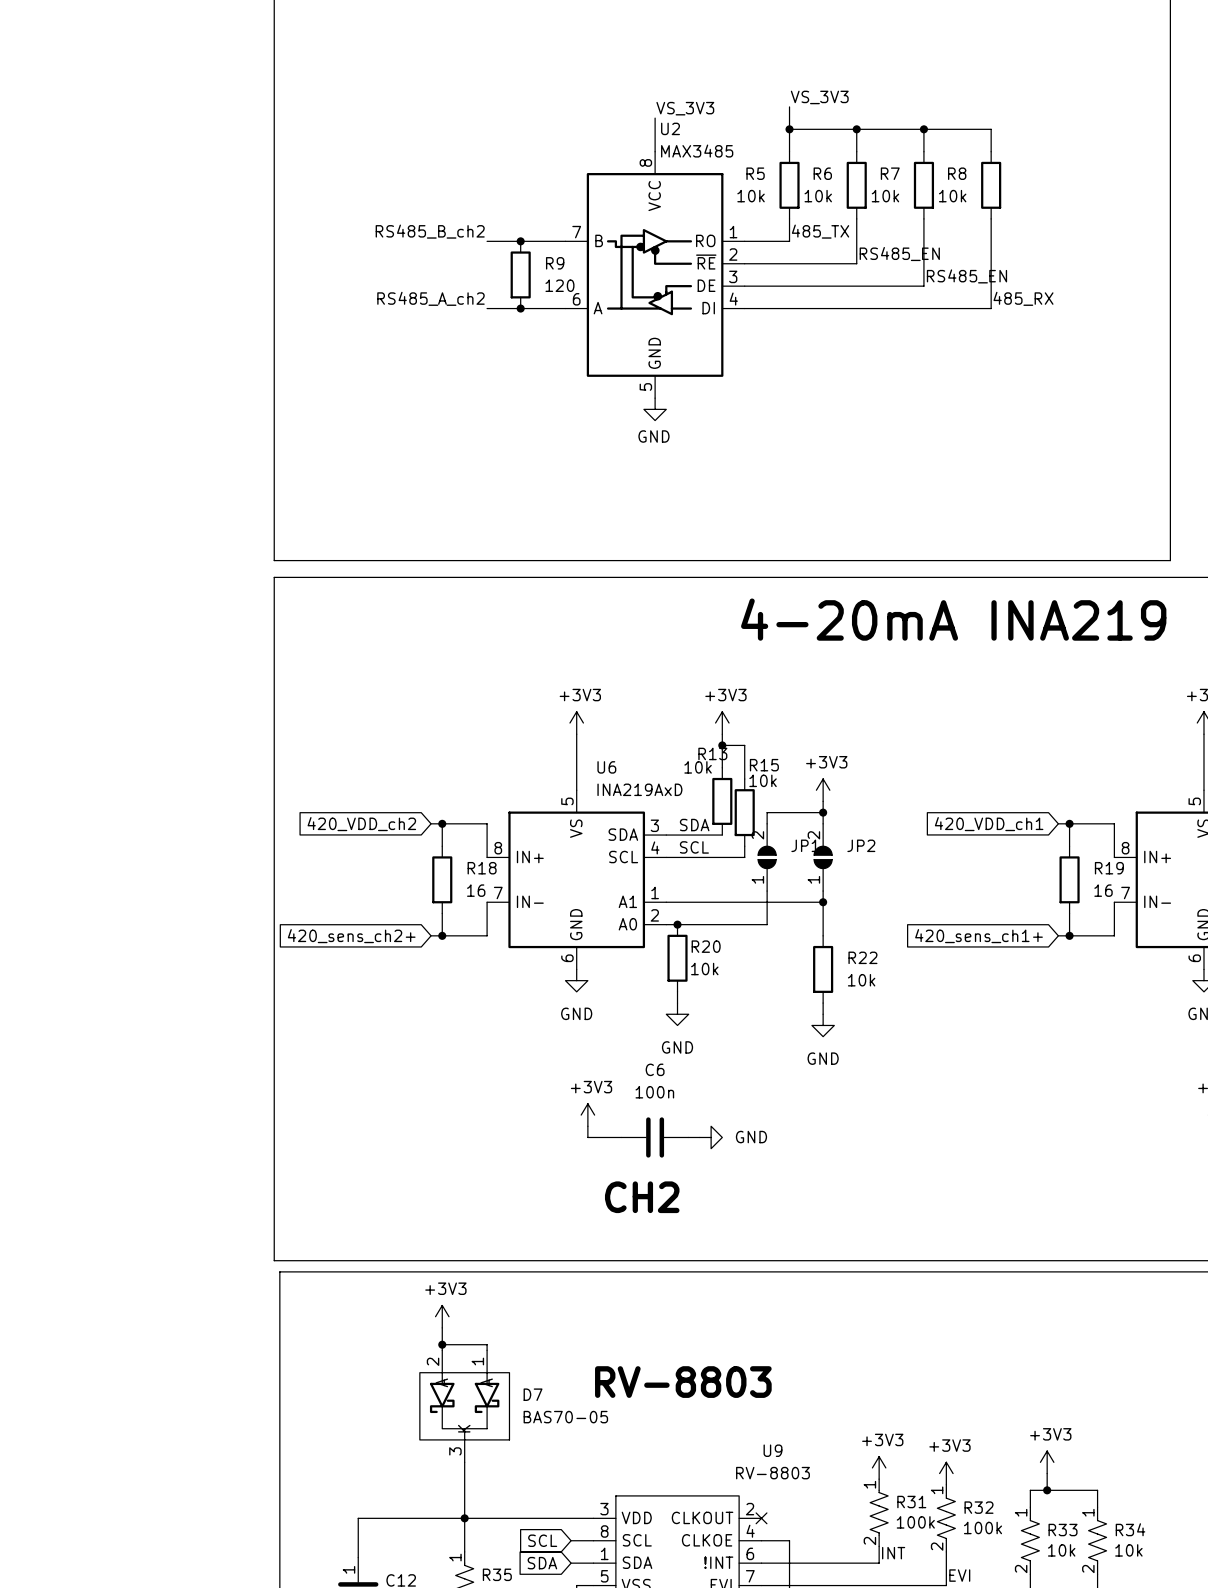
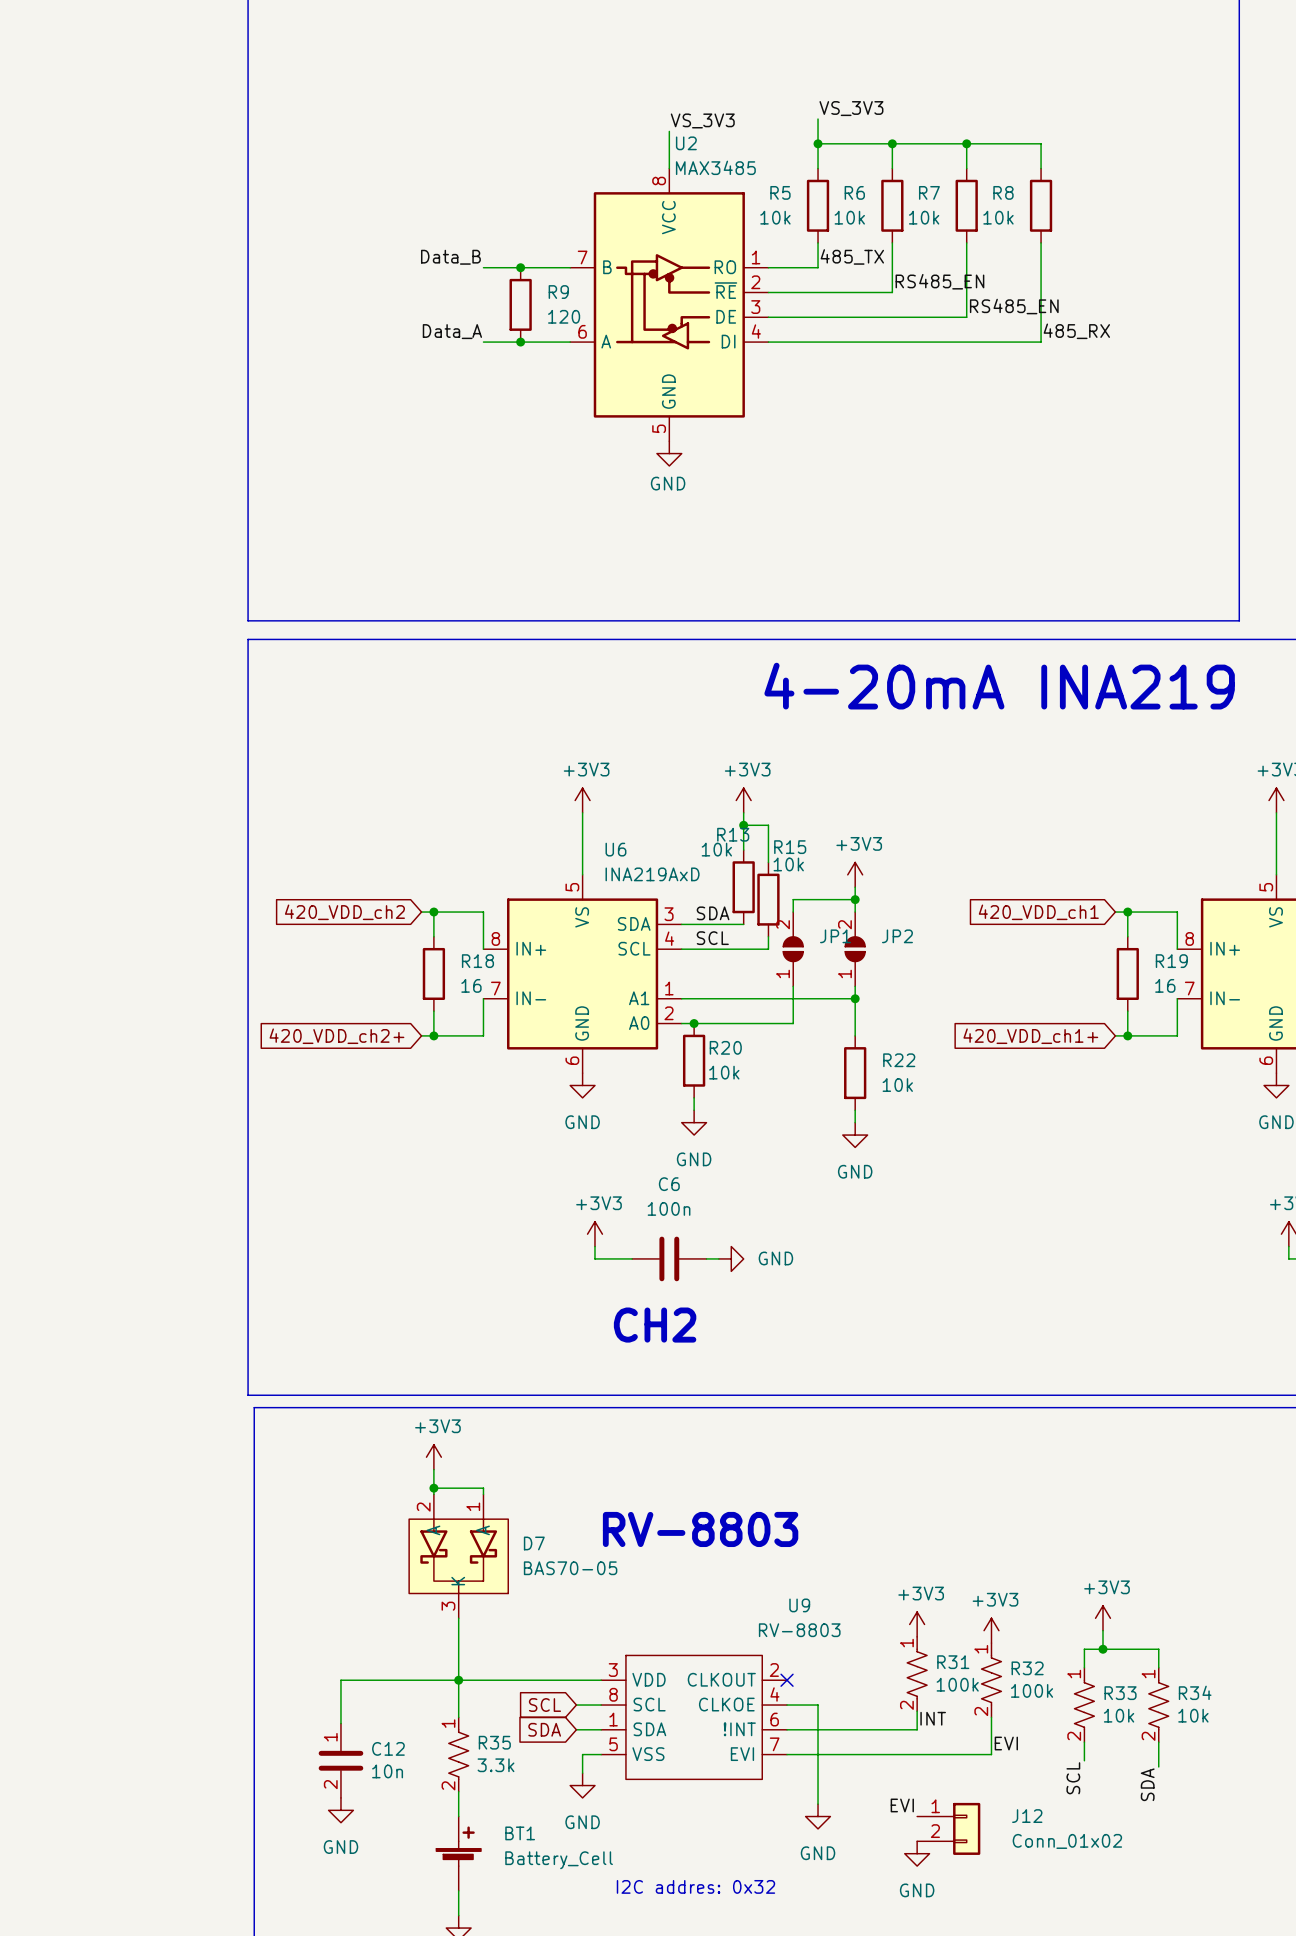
label: RS485_B_ch2 (430, 231) -> Data_B (450, 257)
label: RS485_A_ch2 (430, 298) -> Data_A (452, 331)
global label: 420_sens_ch2+ (351, 936) -> 420_VDD_ch2+ (336, 1036)
global label: 420_sens_ch1+ (979, 936) -> 420_VDD_ch1+ (1030, 1036)

